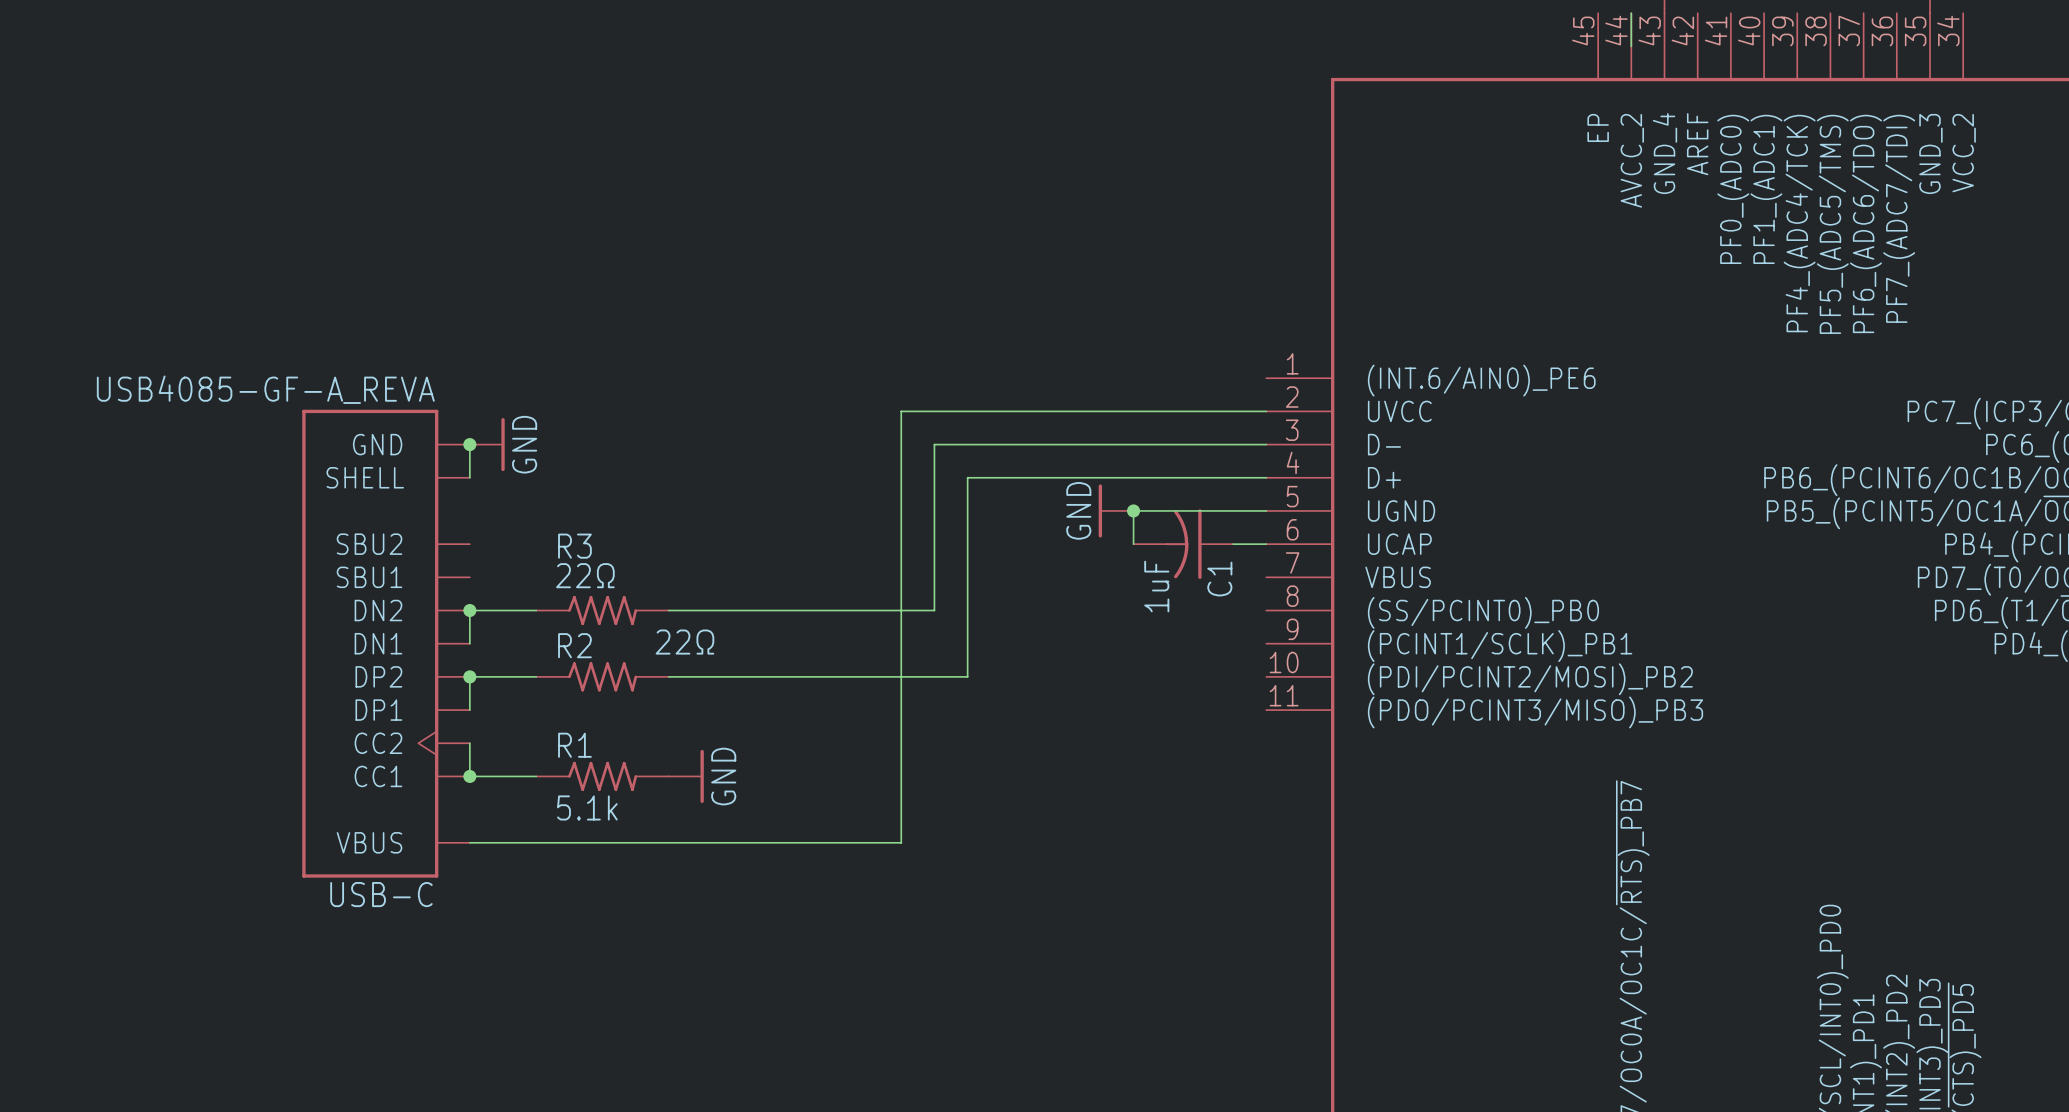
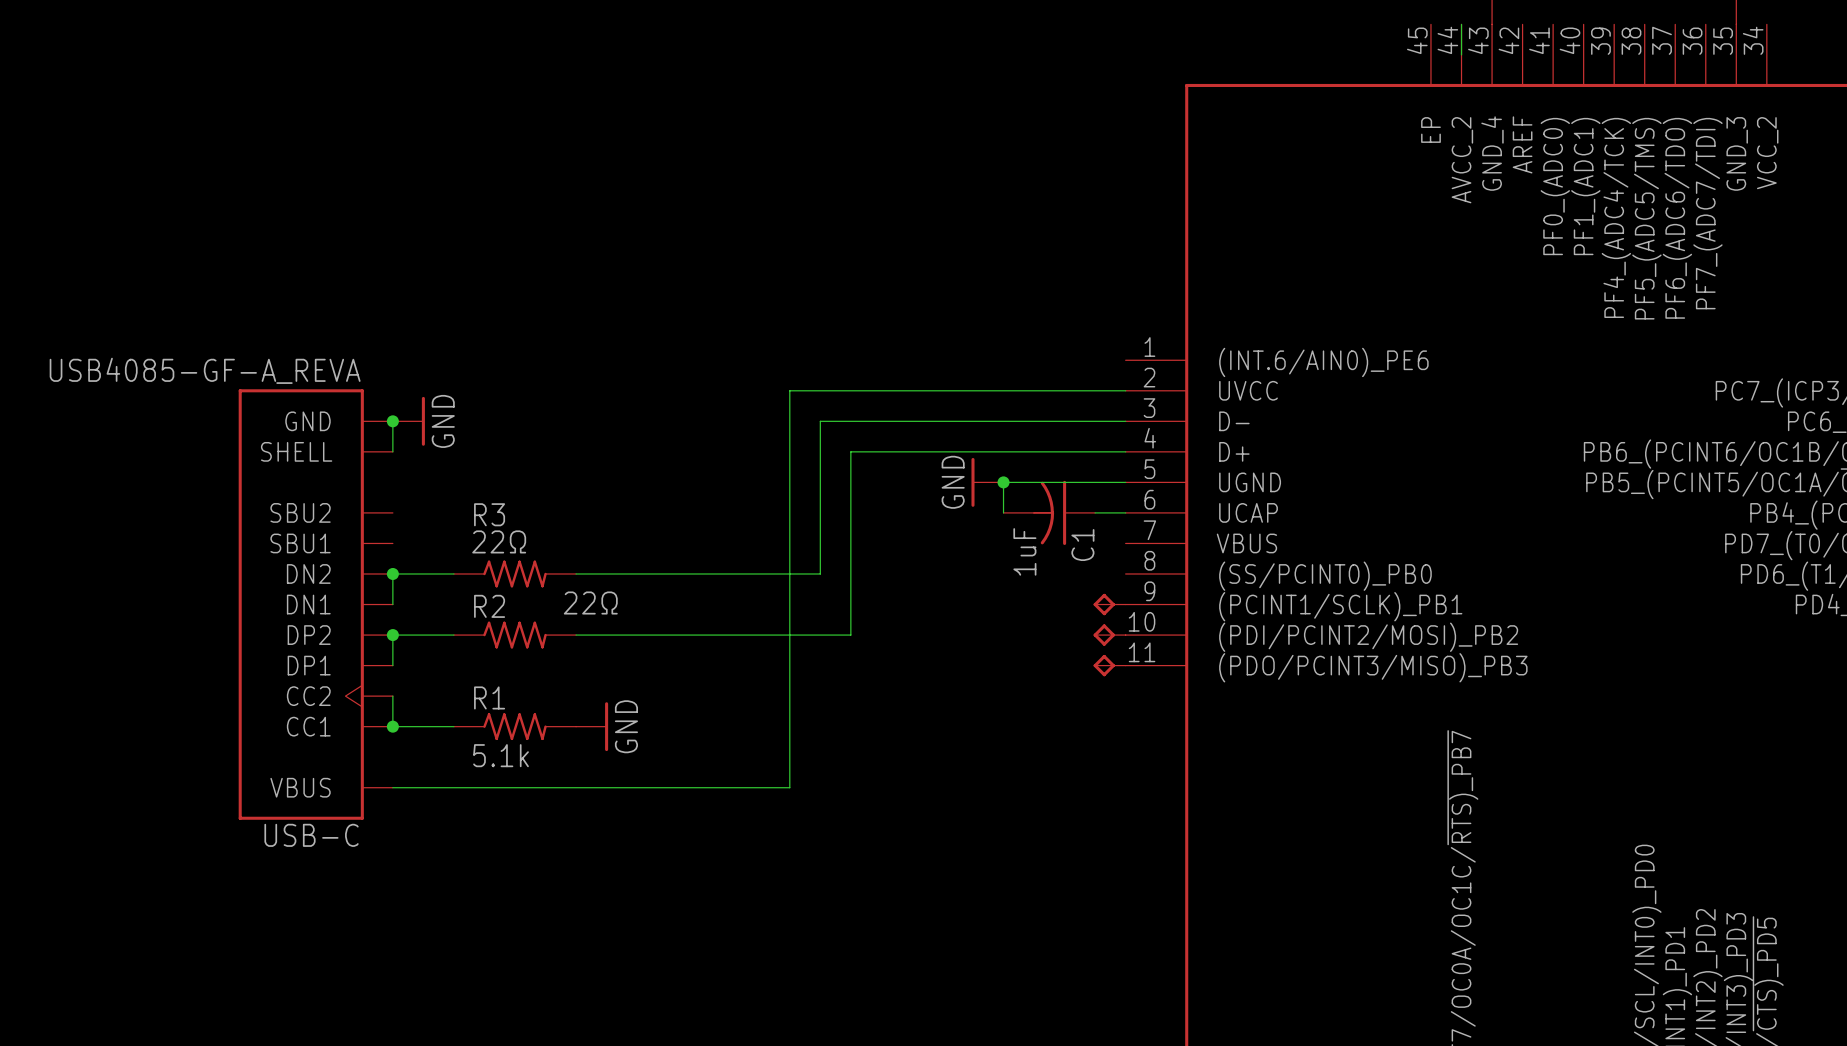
part: none -> (1109, 604)
part: none -> (1109, 635)
part: none -> (1109, 665)

